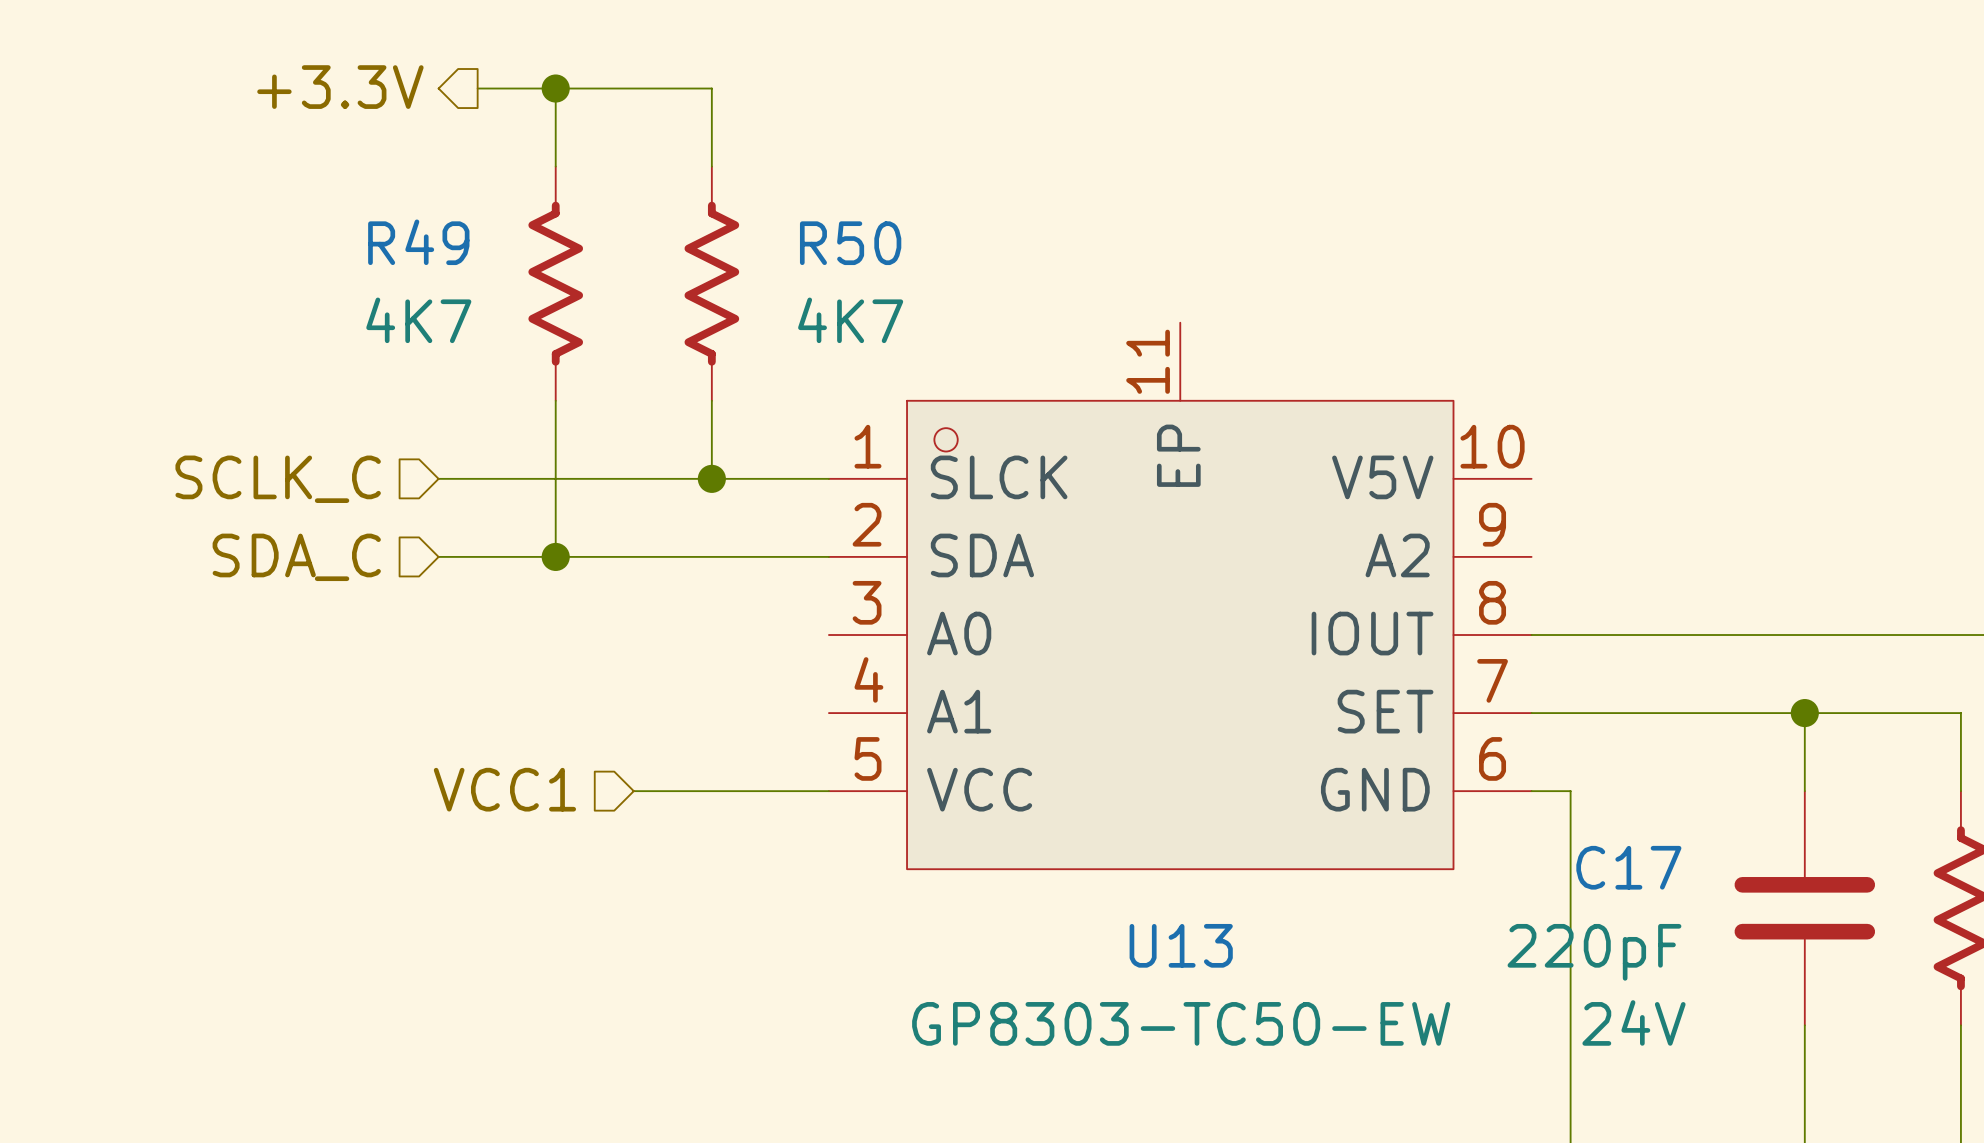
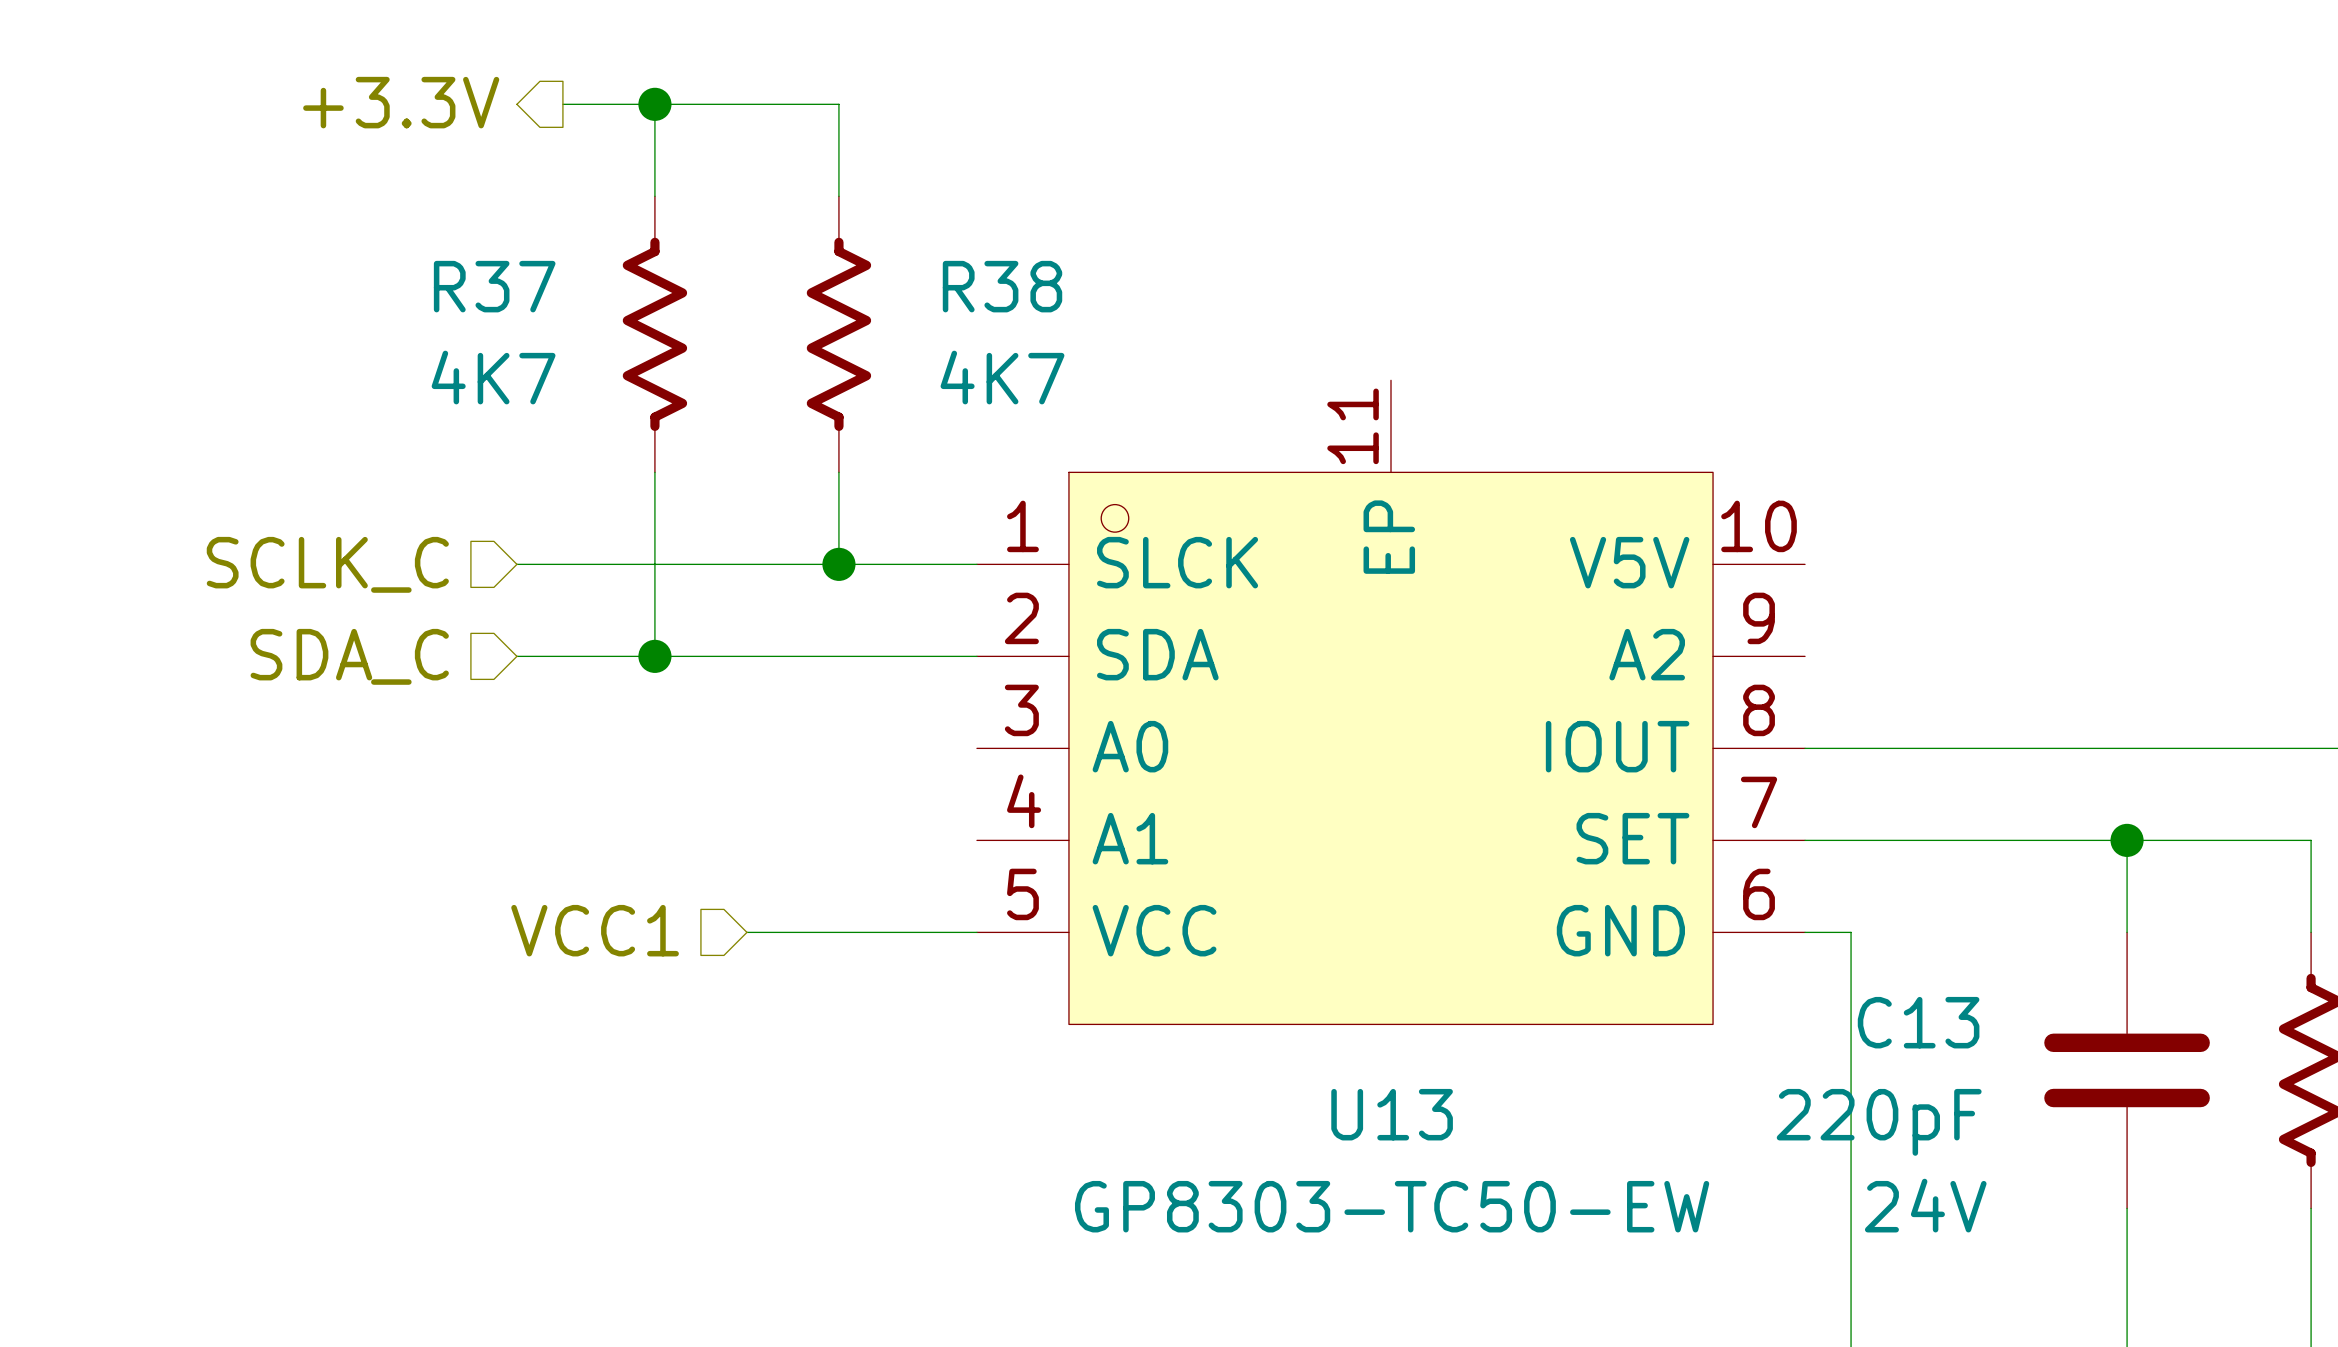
R49 name: R49 (418, 242) -> R37 (494, 286)
R50 name: R50 (850, 243) -> R38 (1002, 286)
C17 name: C17 (1628, 867) -> C13 (1918, 1022)

